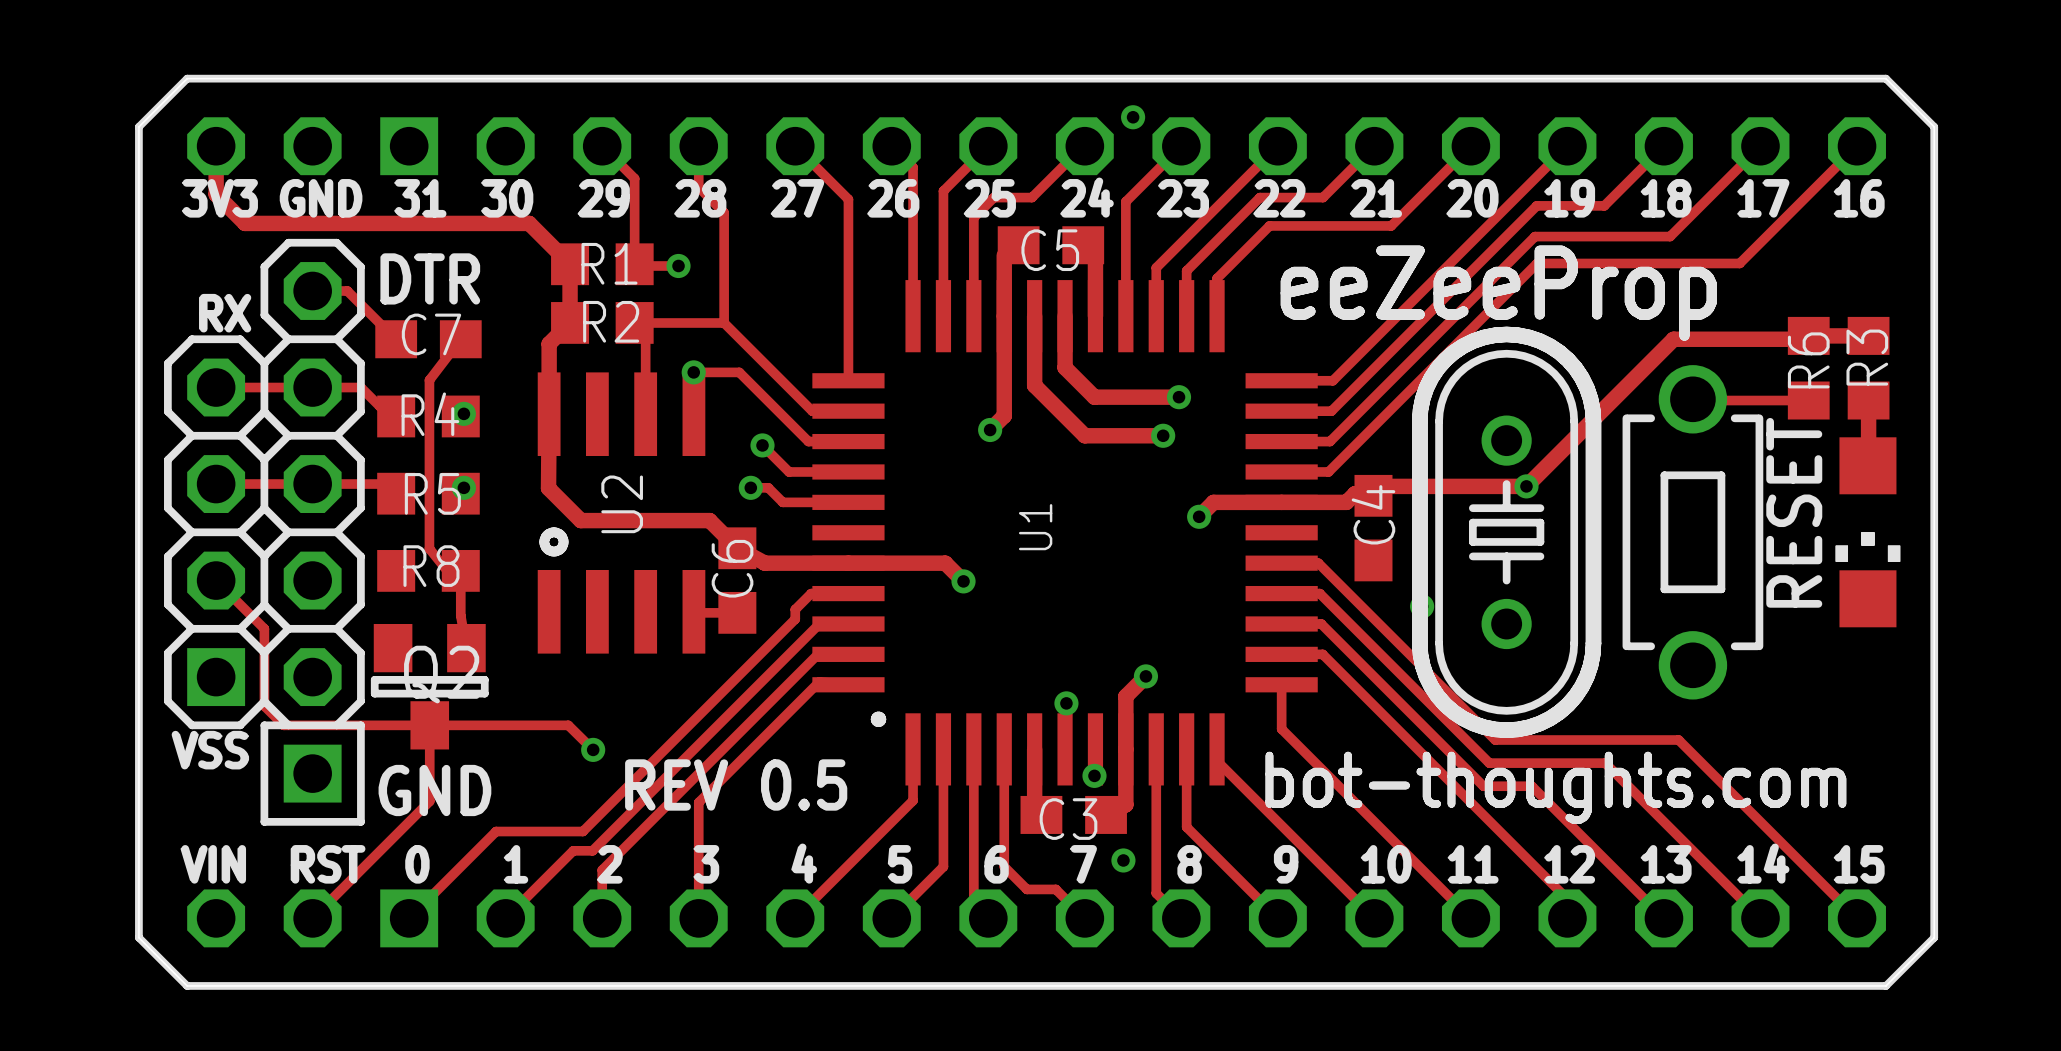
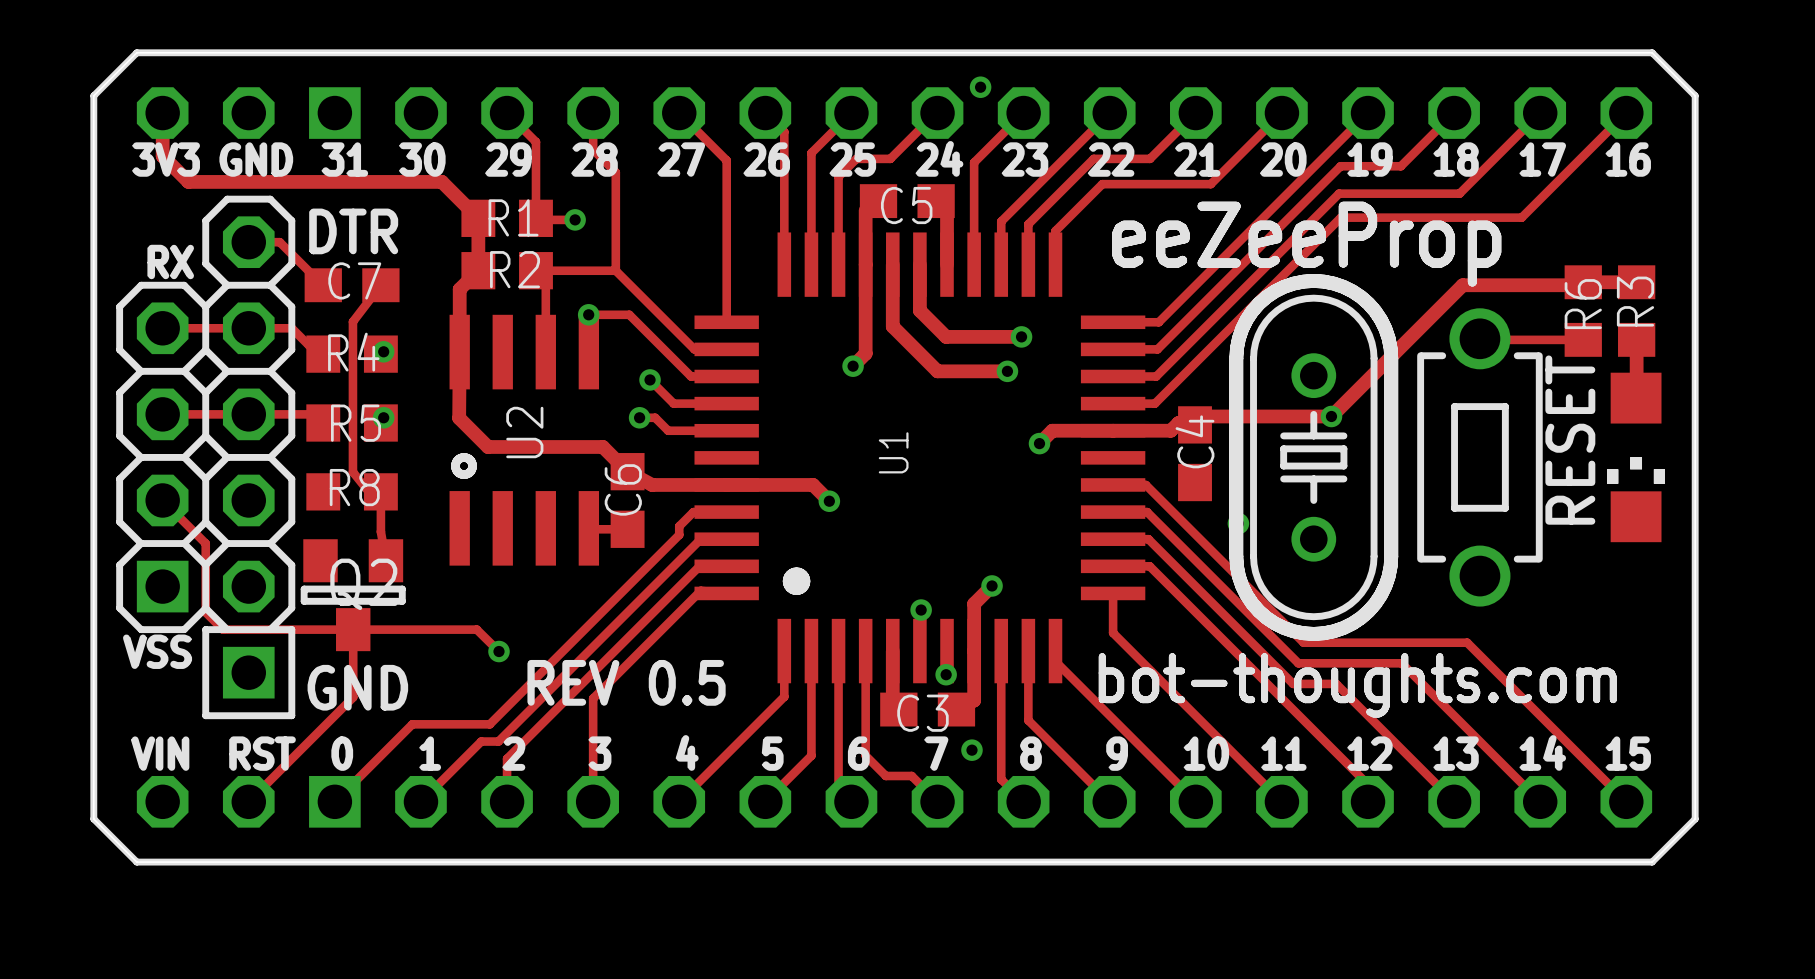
U1 footprint: [812, 280, 1318, 786] -> [694, 232, 1146, 684]

